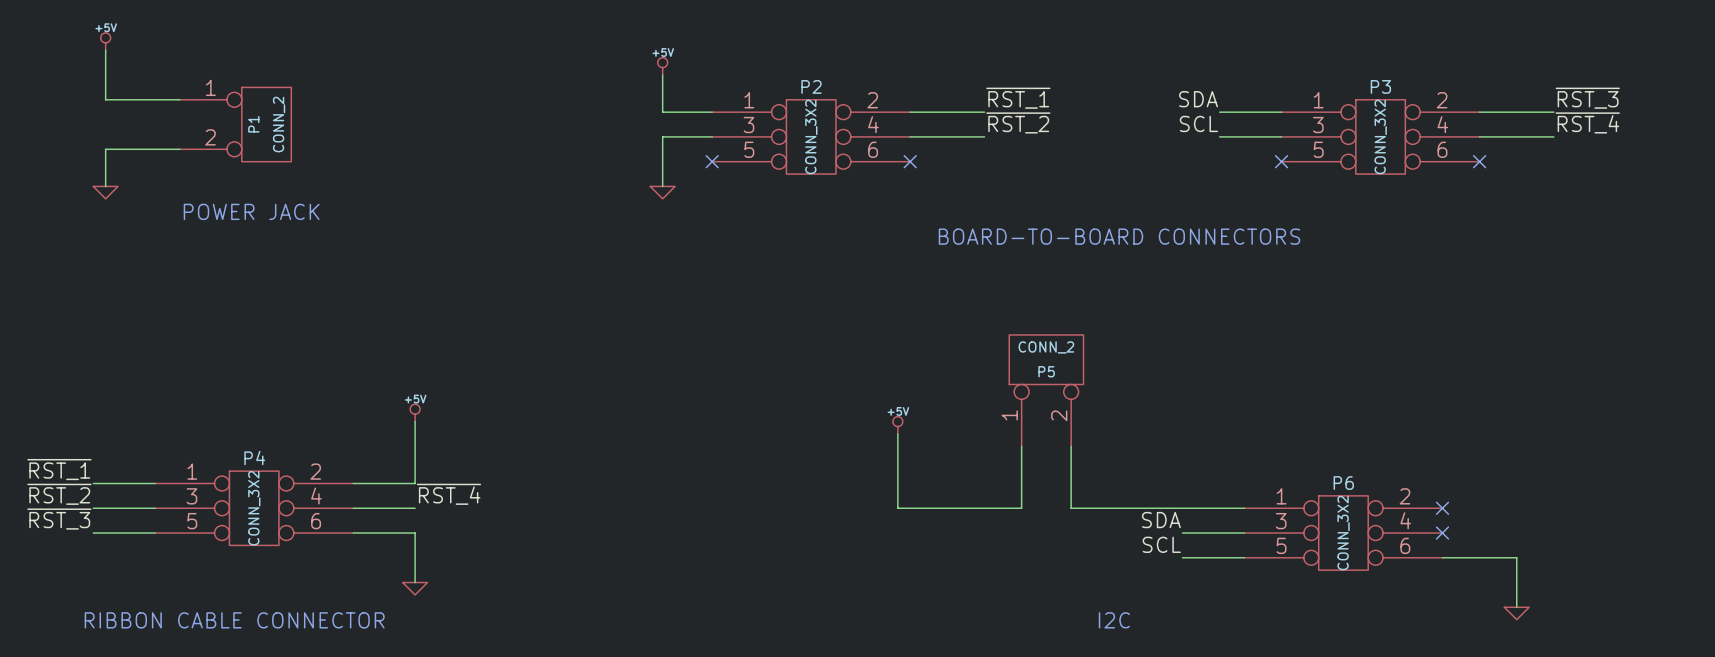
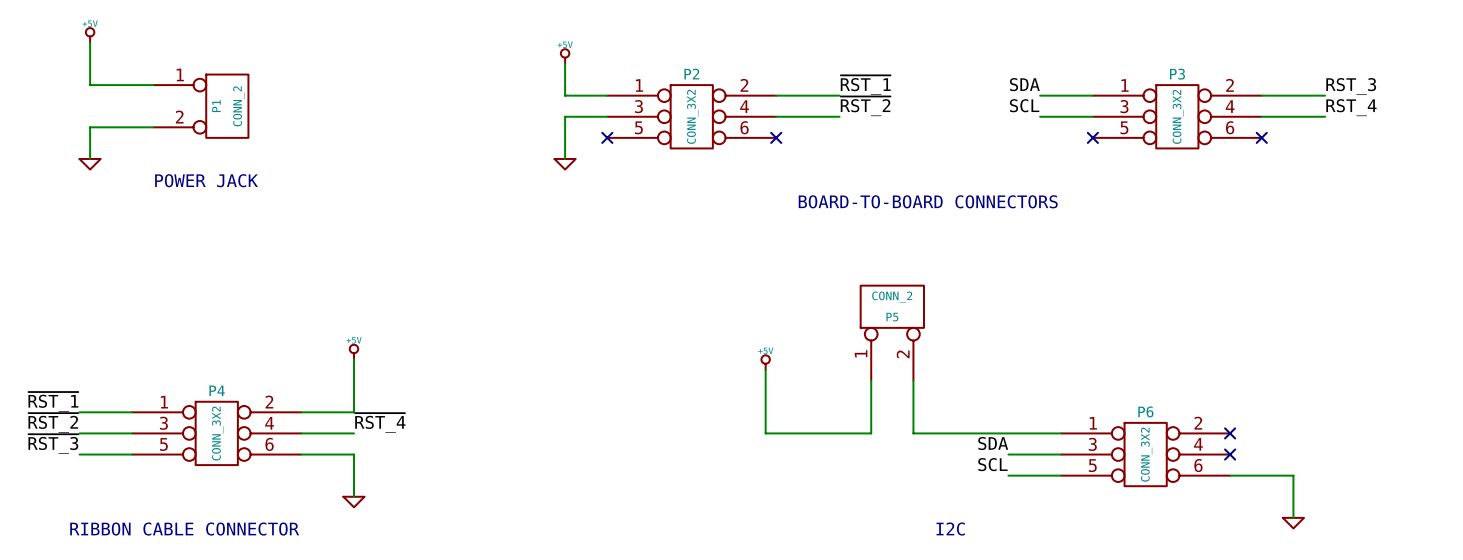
label: ~{RST_3} (1587, 98) -> RST_3 (1351, 86)
label: ~{RST_4} (1587, 122) -> RST_4 (1351, 107)

